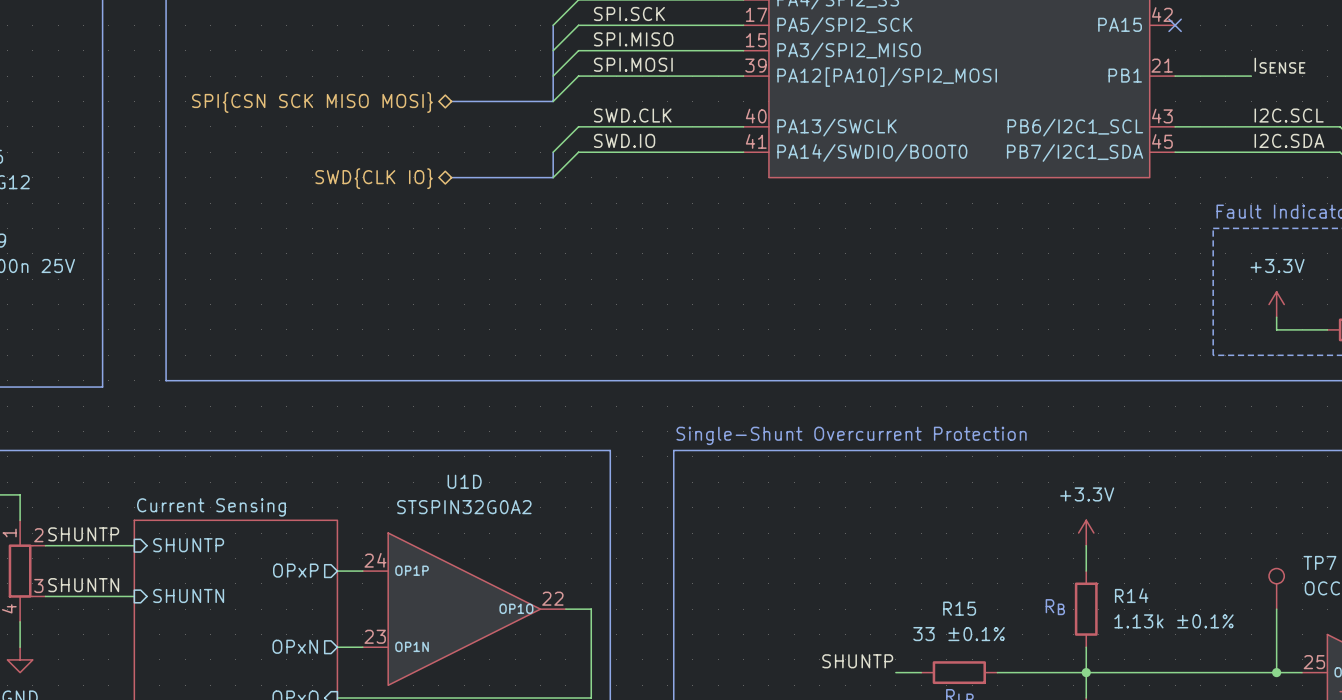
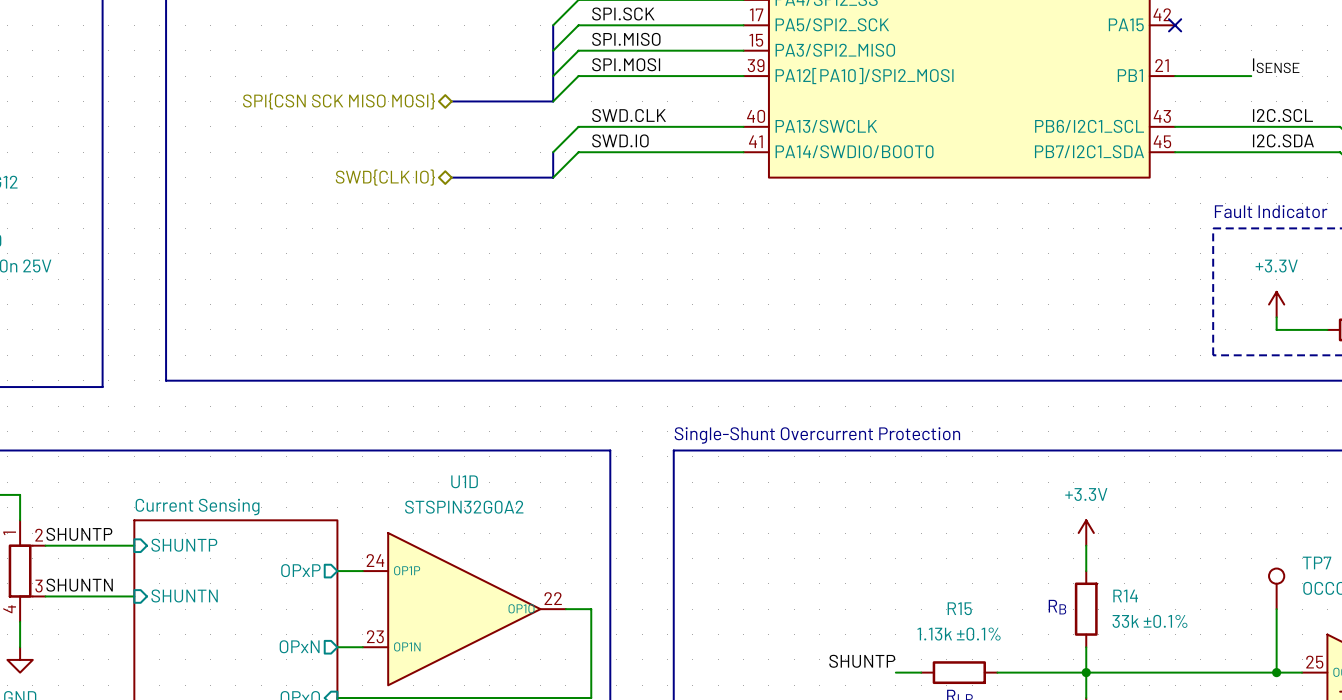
R14 value: 1.13k ±0.1% (1173, 621) -> 33k ±0.1% (1149, 621)
R15 value: 33 ±0.1% (959, 634) -> 1.13k ±0.1% (959, 634)

